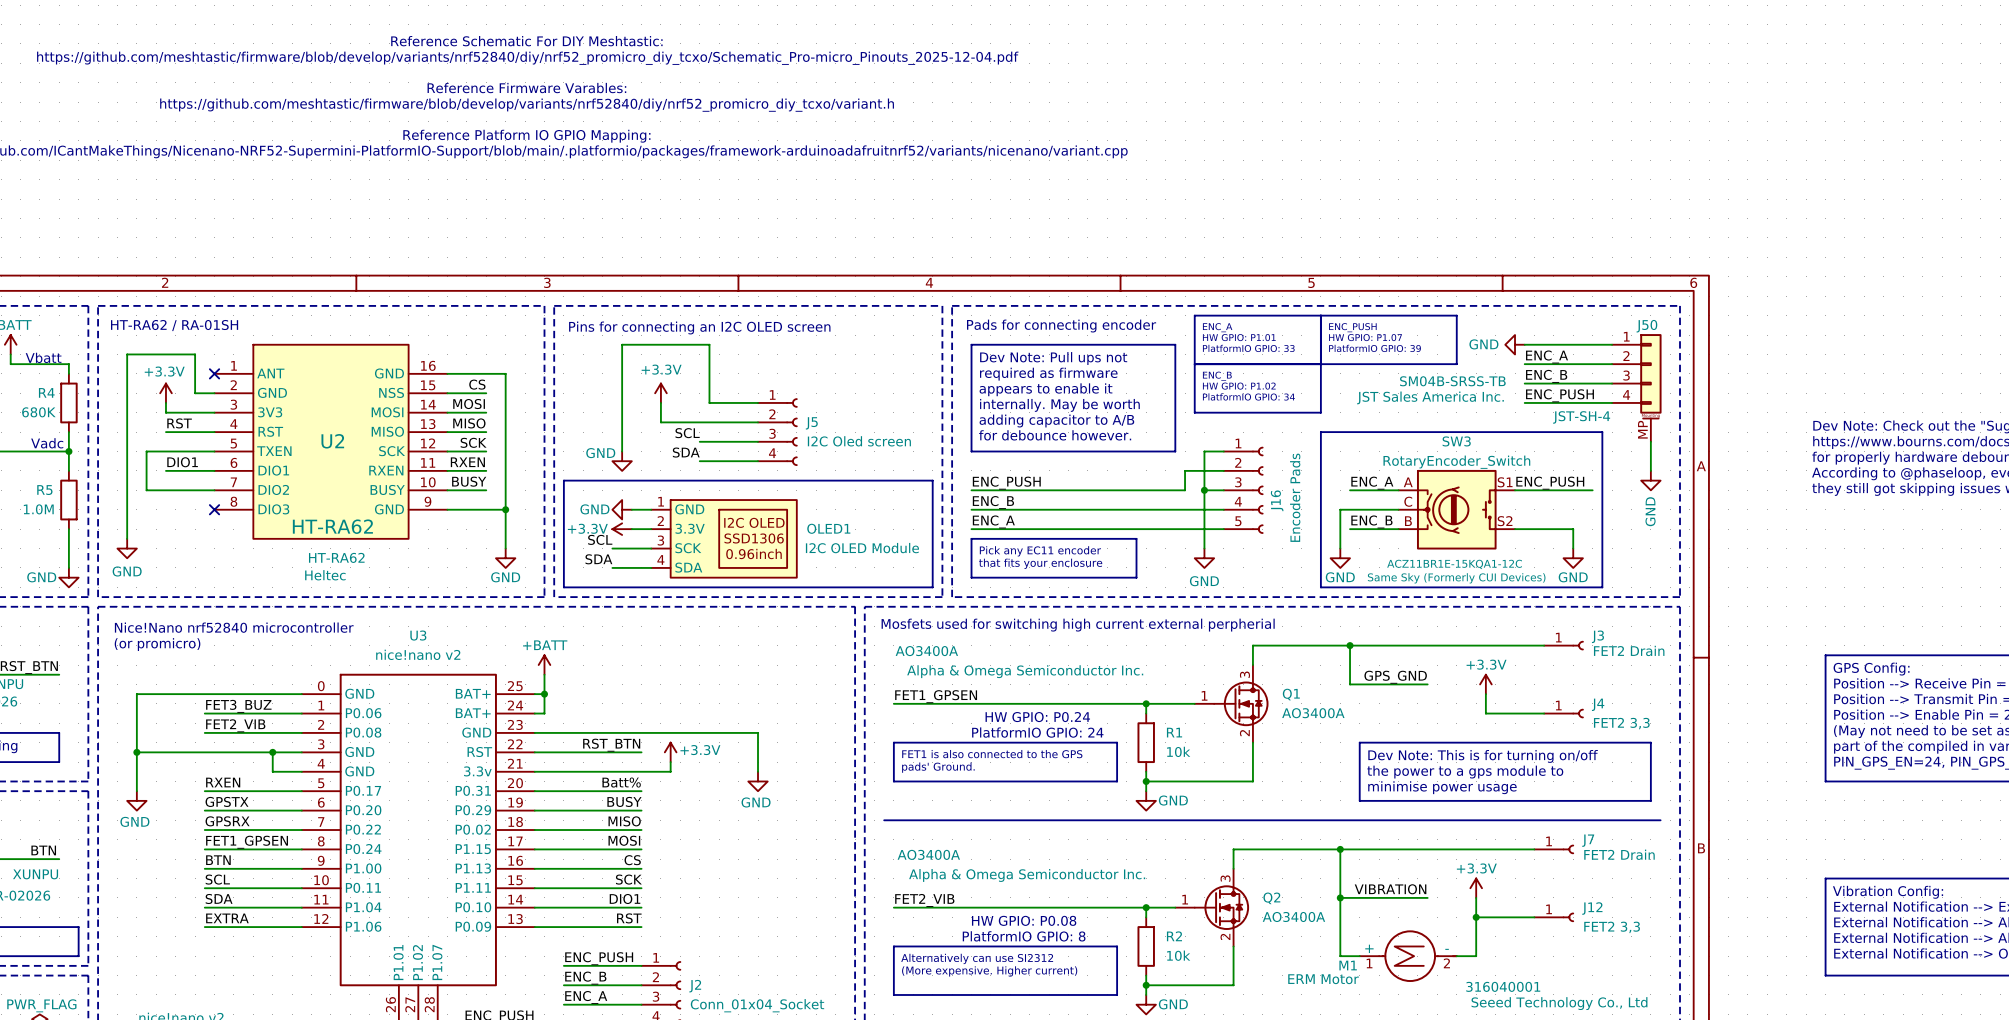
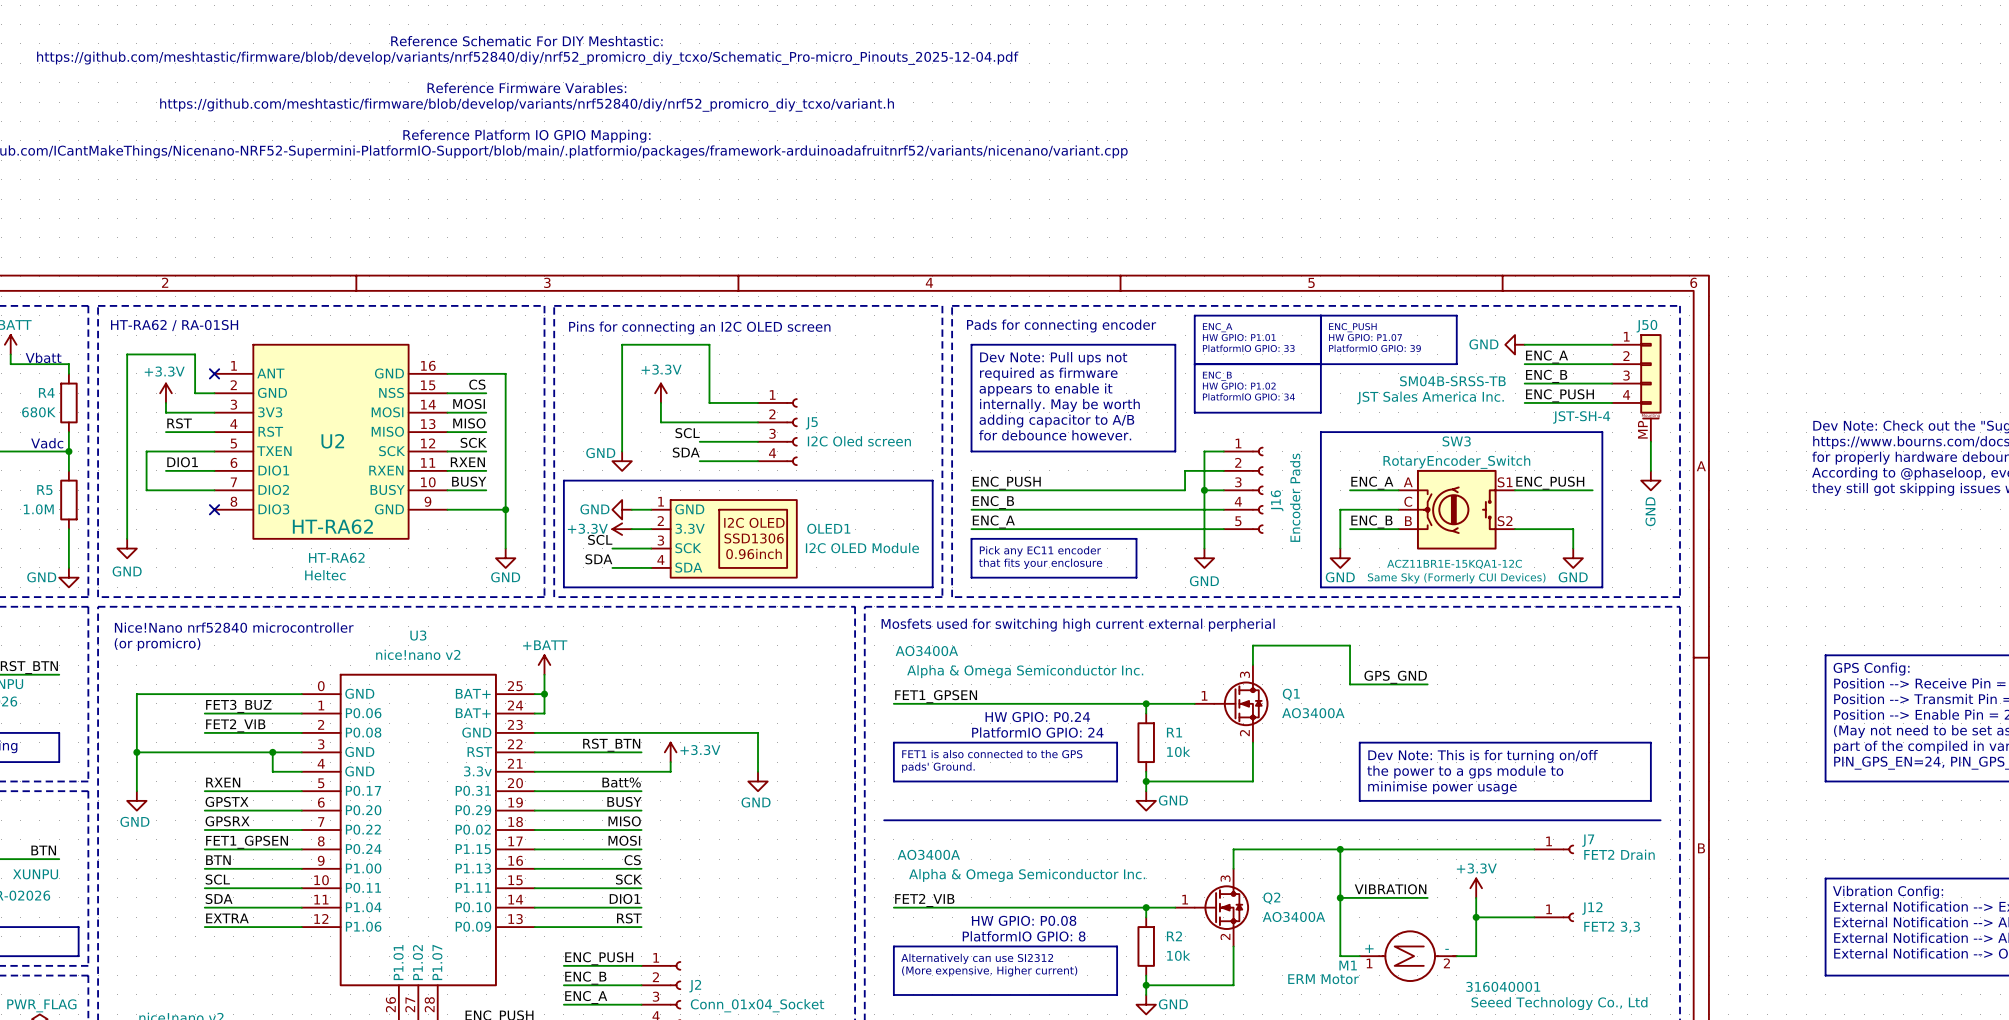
wire: (1350, 645) (1544, 645) -> none
junction: (1350, 645) -> none
J3: FET2 Drain (1563, 645) -> none
power symbol: +3.3V (1485, 684) -> none
wire: (1485, 694) (1485, 713) (1544, 713) -> none
J4: FET2 3,3 (1563, 713) -> none

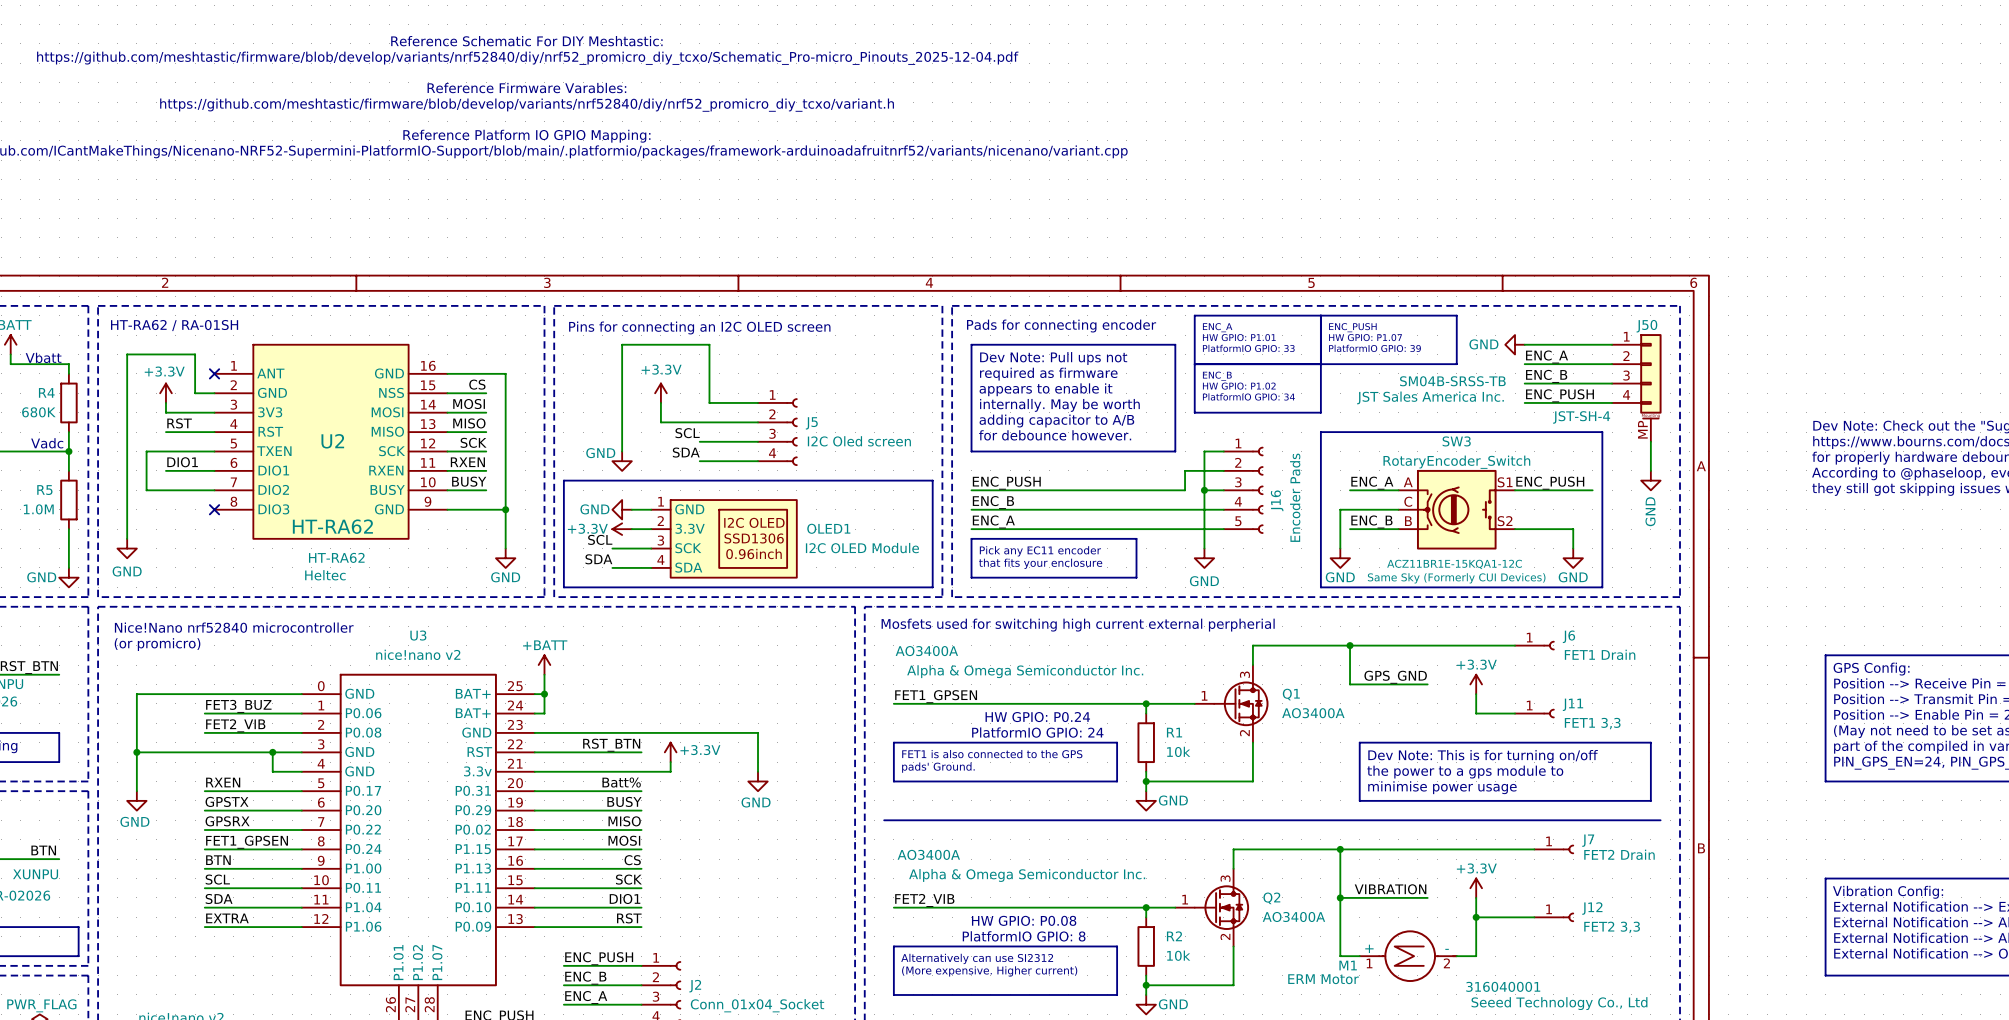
wire: none -> (1350, 645) (1515, 645)
junction: none -> (1350, 645)
J6: none -> FET1 Drain (1534, 645)
power symbol: none -> +3.3V (1476, 684)
wire: none -> (1476, 694) (1476, 713) (1515, 713)
J11: none -> FET1 3,3 (1534, 713)

